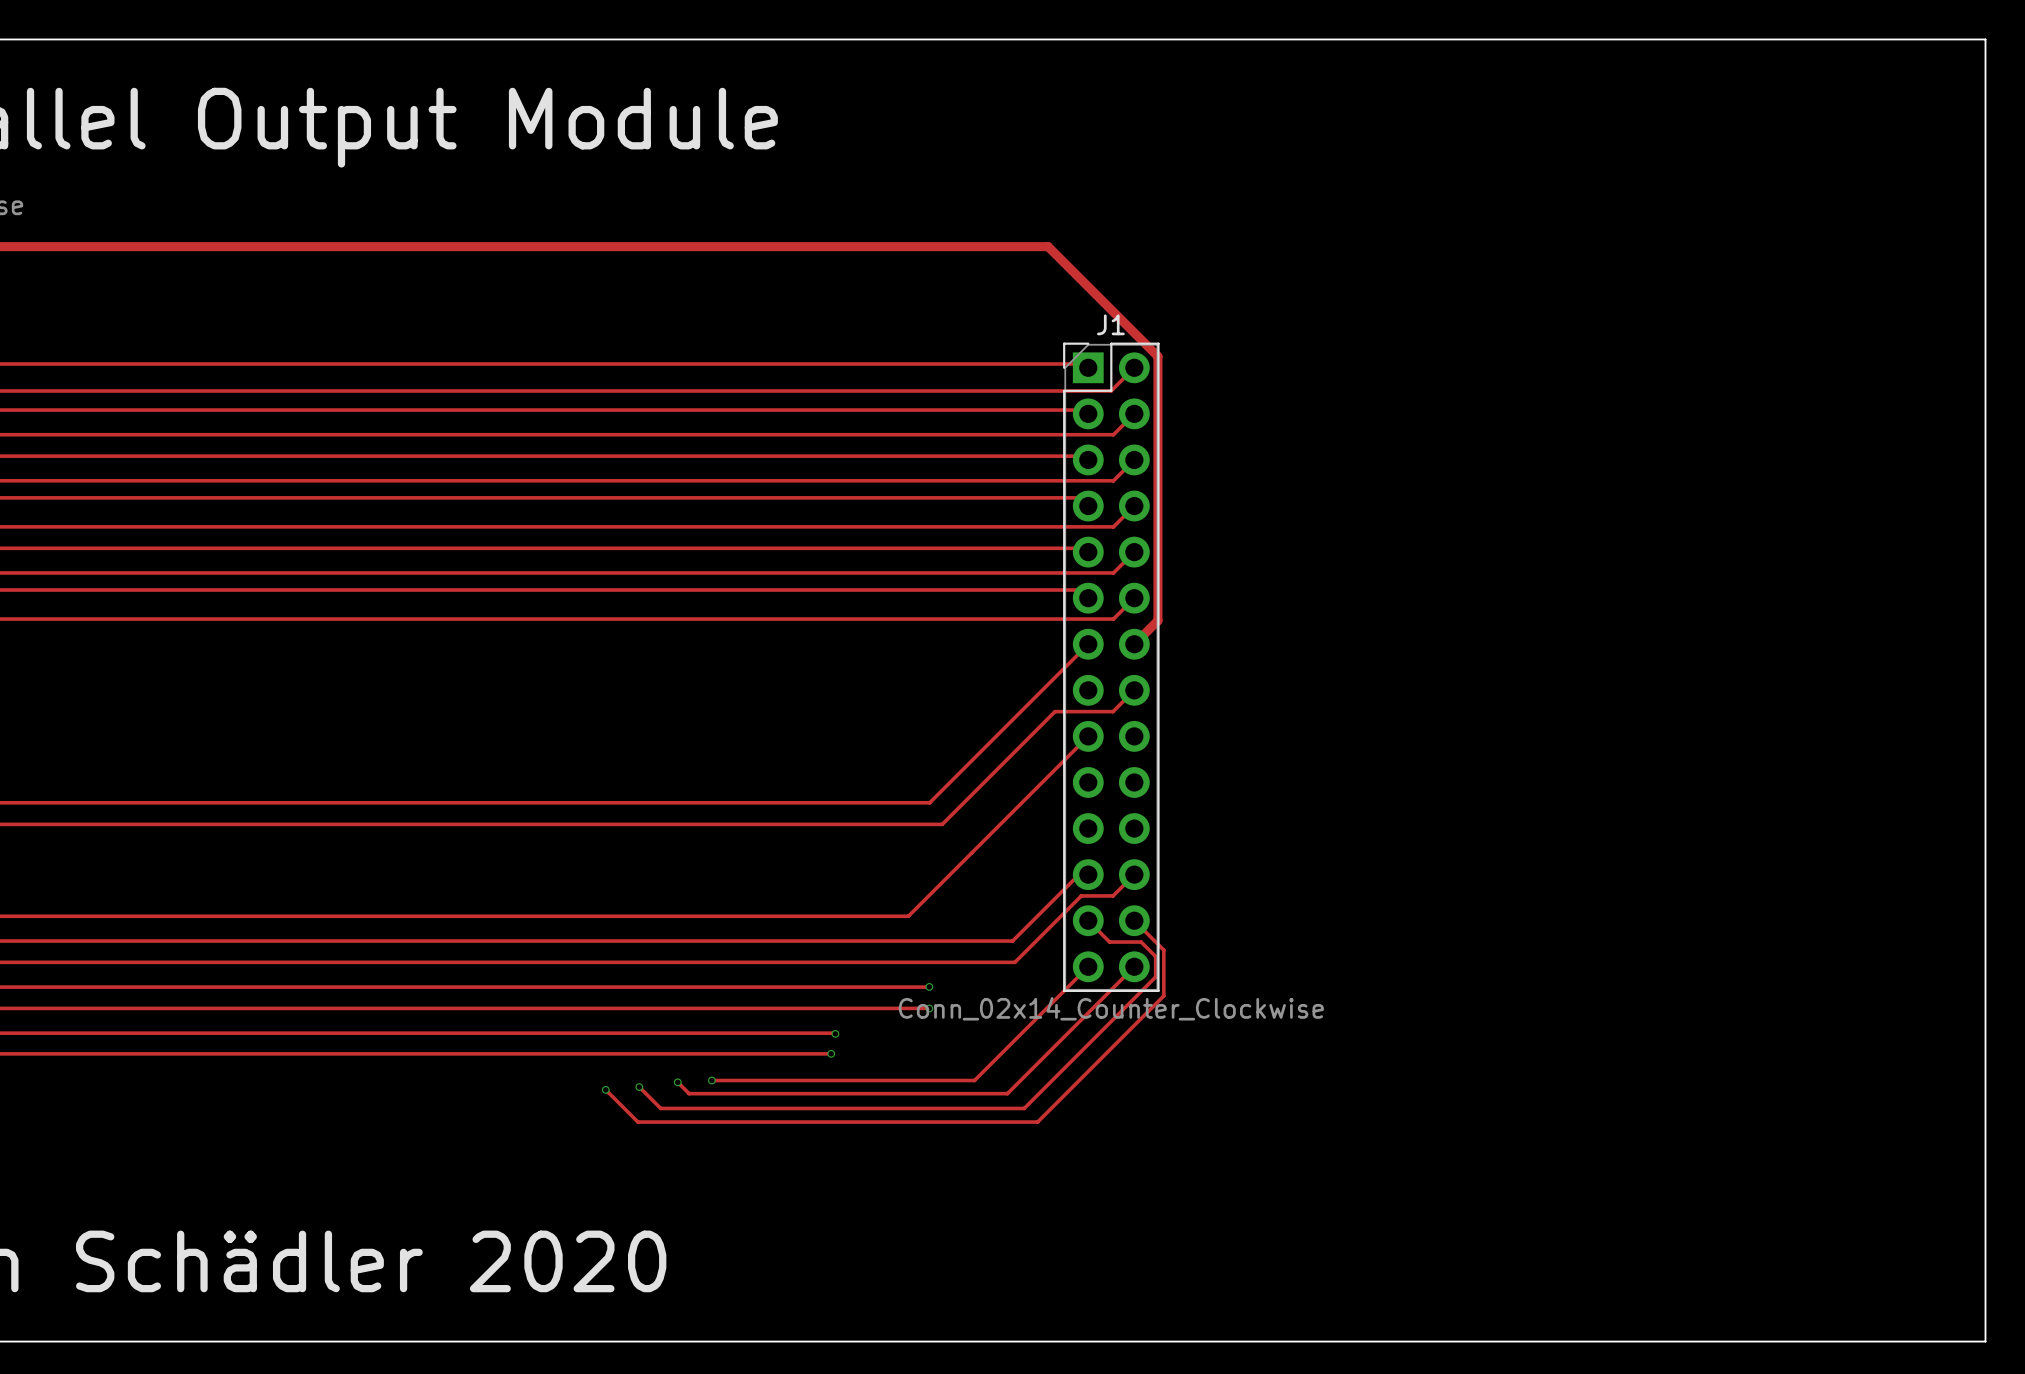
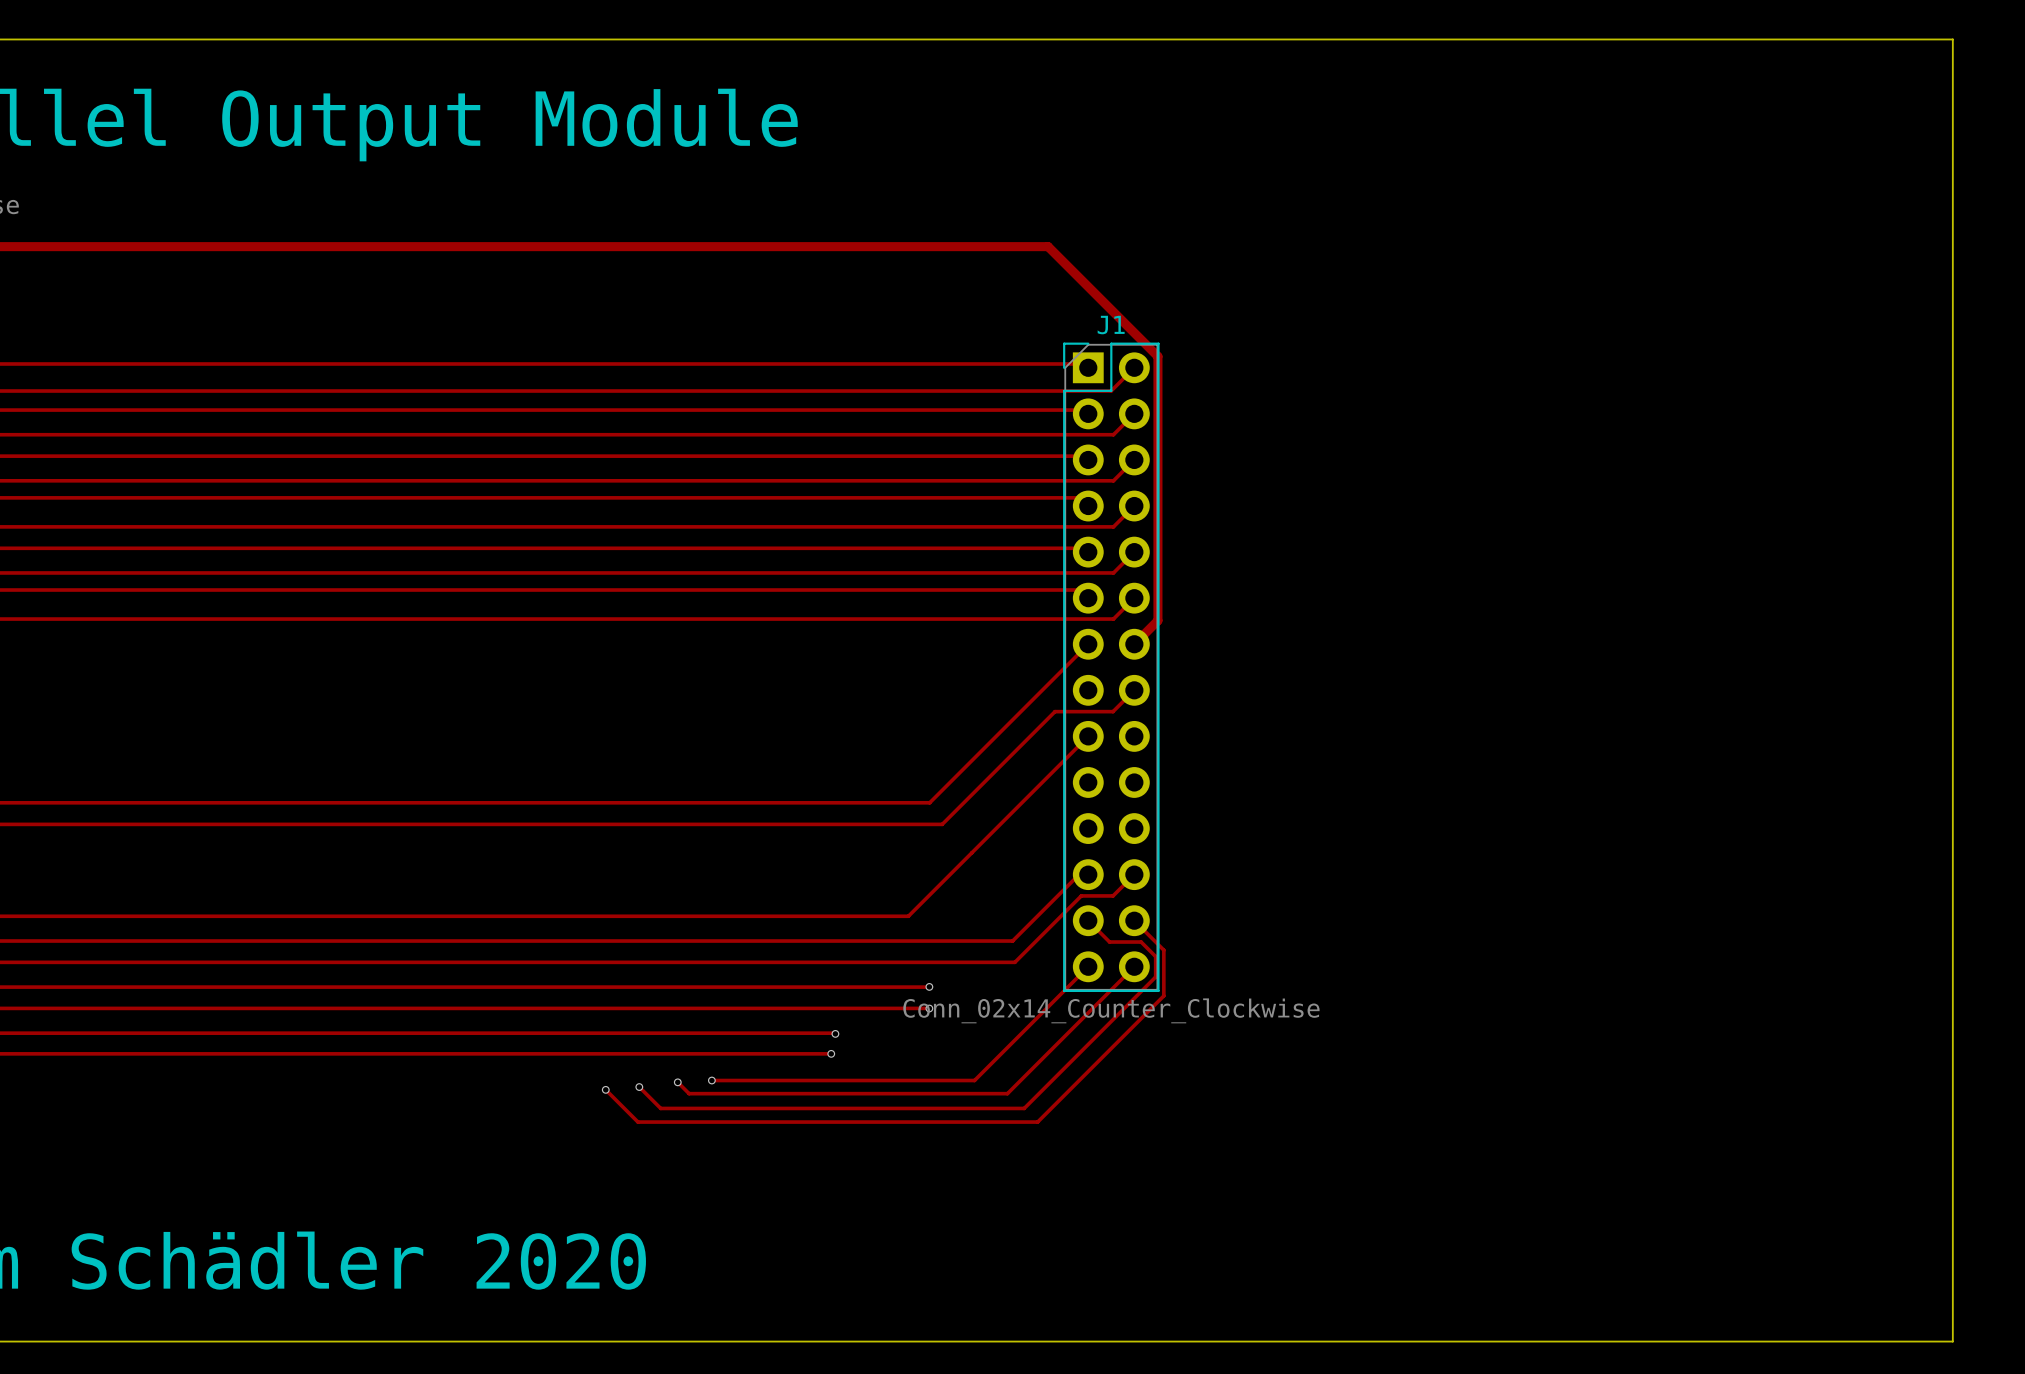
board edge: (1952, 39) (1985, 39) (1985, 1341) (1952, 1341) -> (1952, 39) (1952, 1341)

